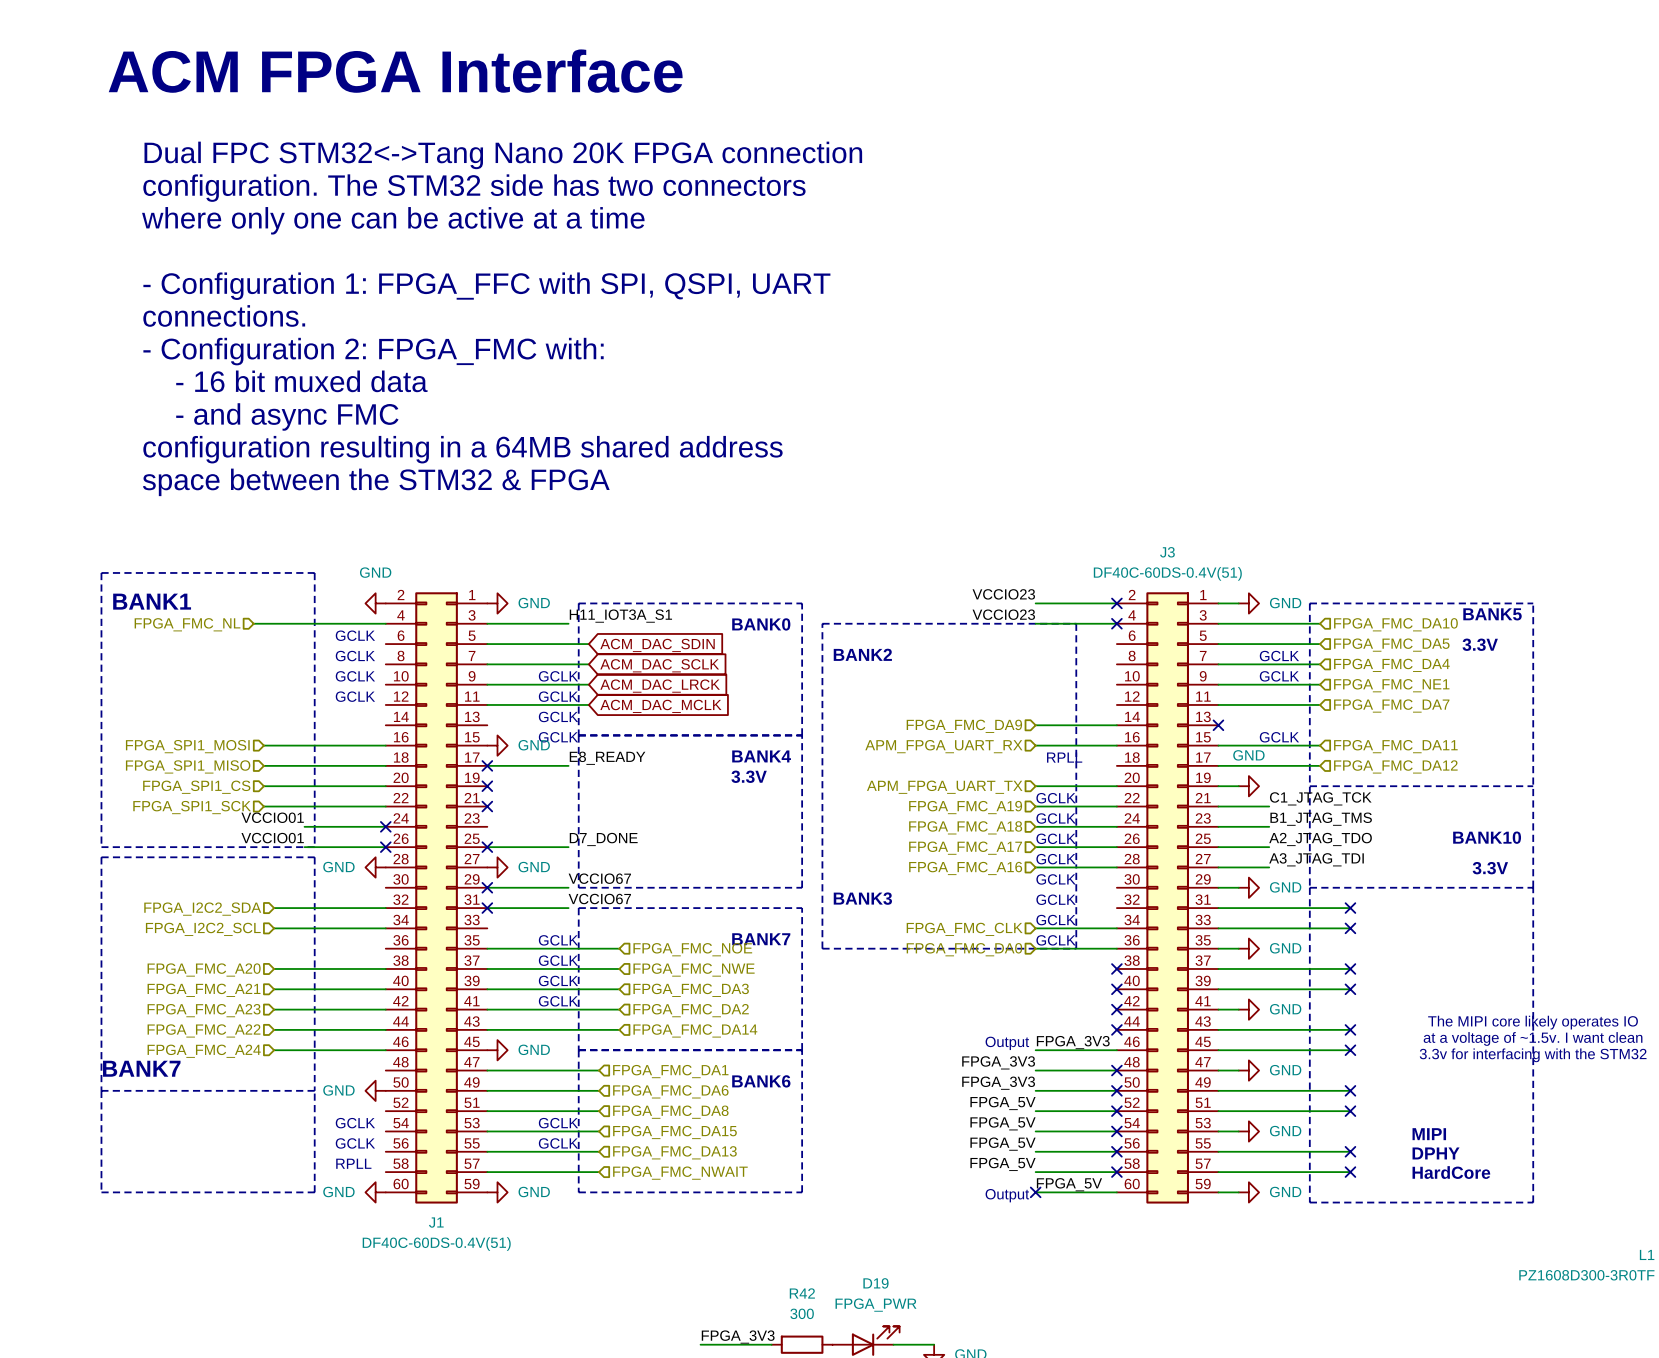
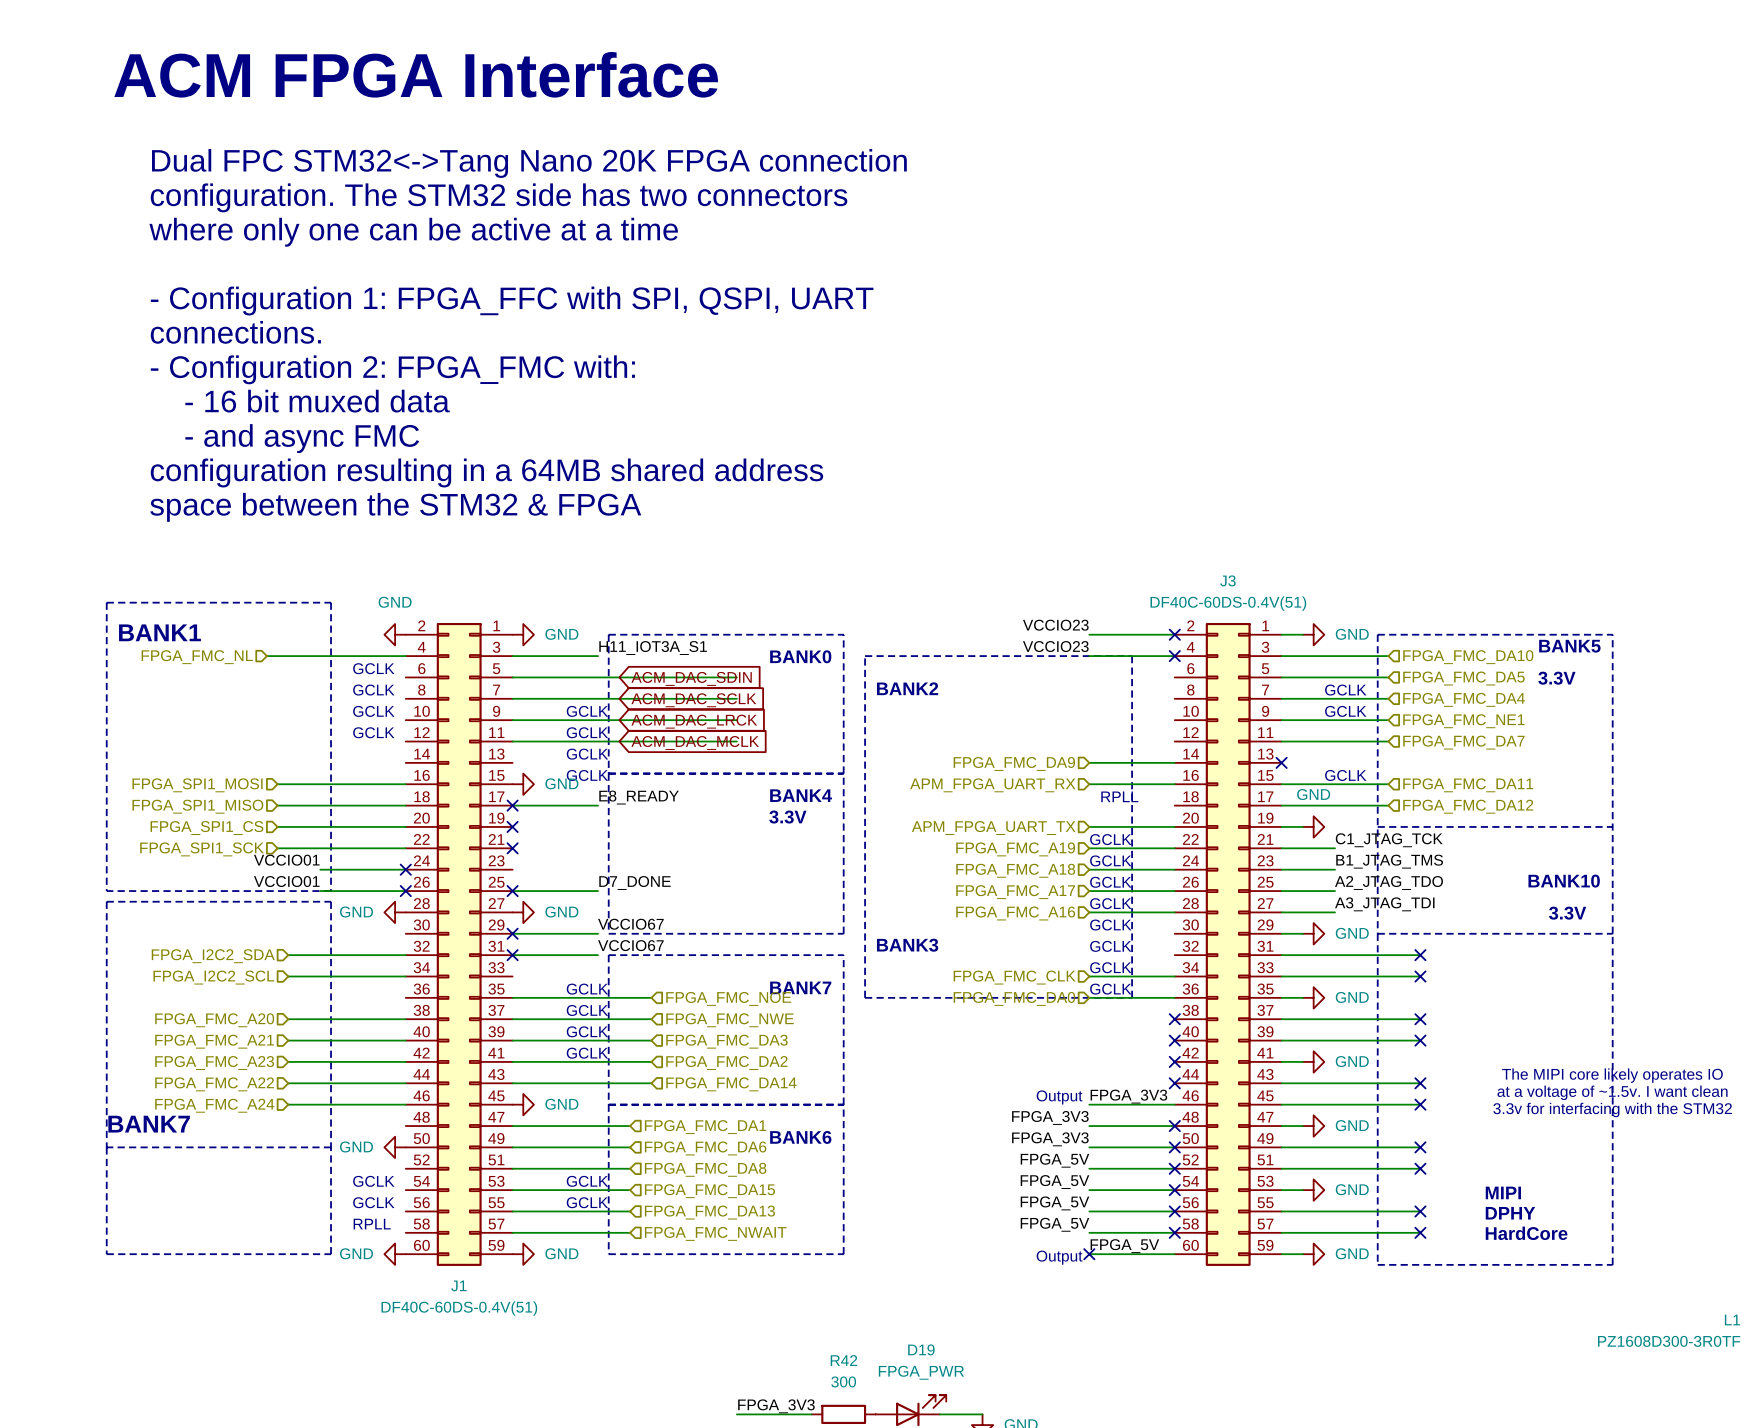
wire: none -> (619, 677) (736, 677)
wire: none -> (619, 698) (736, 698)
wire: none -> (619, 720) (736, 720)
wire: none -> (619, 741) (736, 741)

